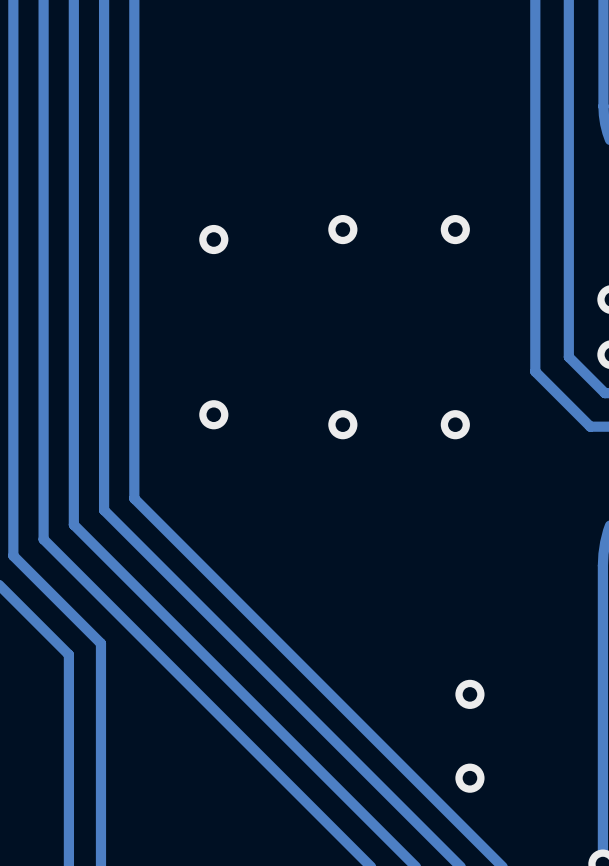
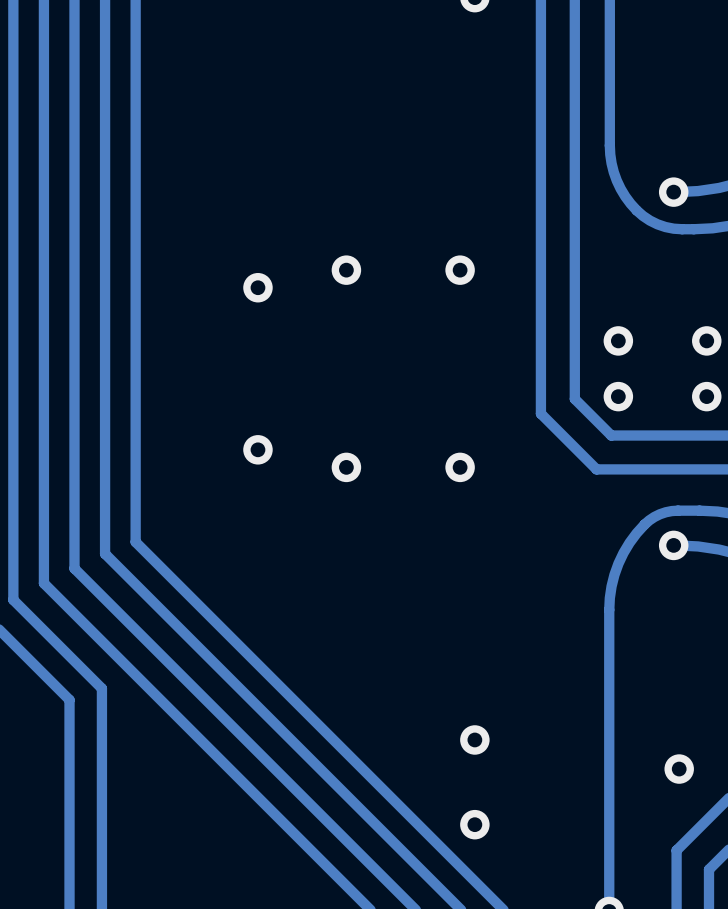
via position: (213, 239) -> (257, 287)
via position: (213, 414) -> (257, 449)

